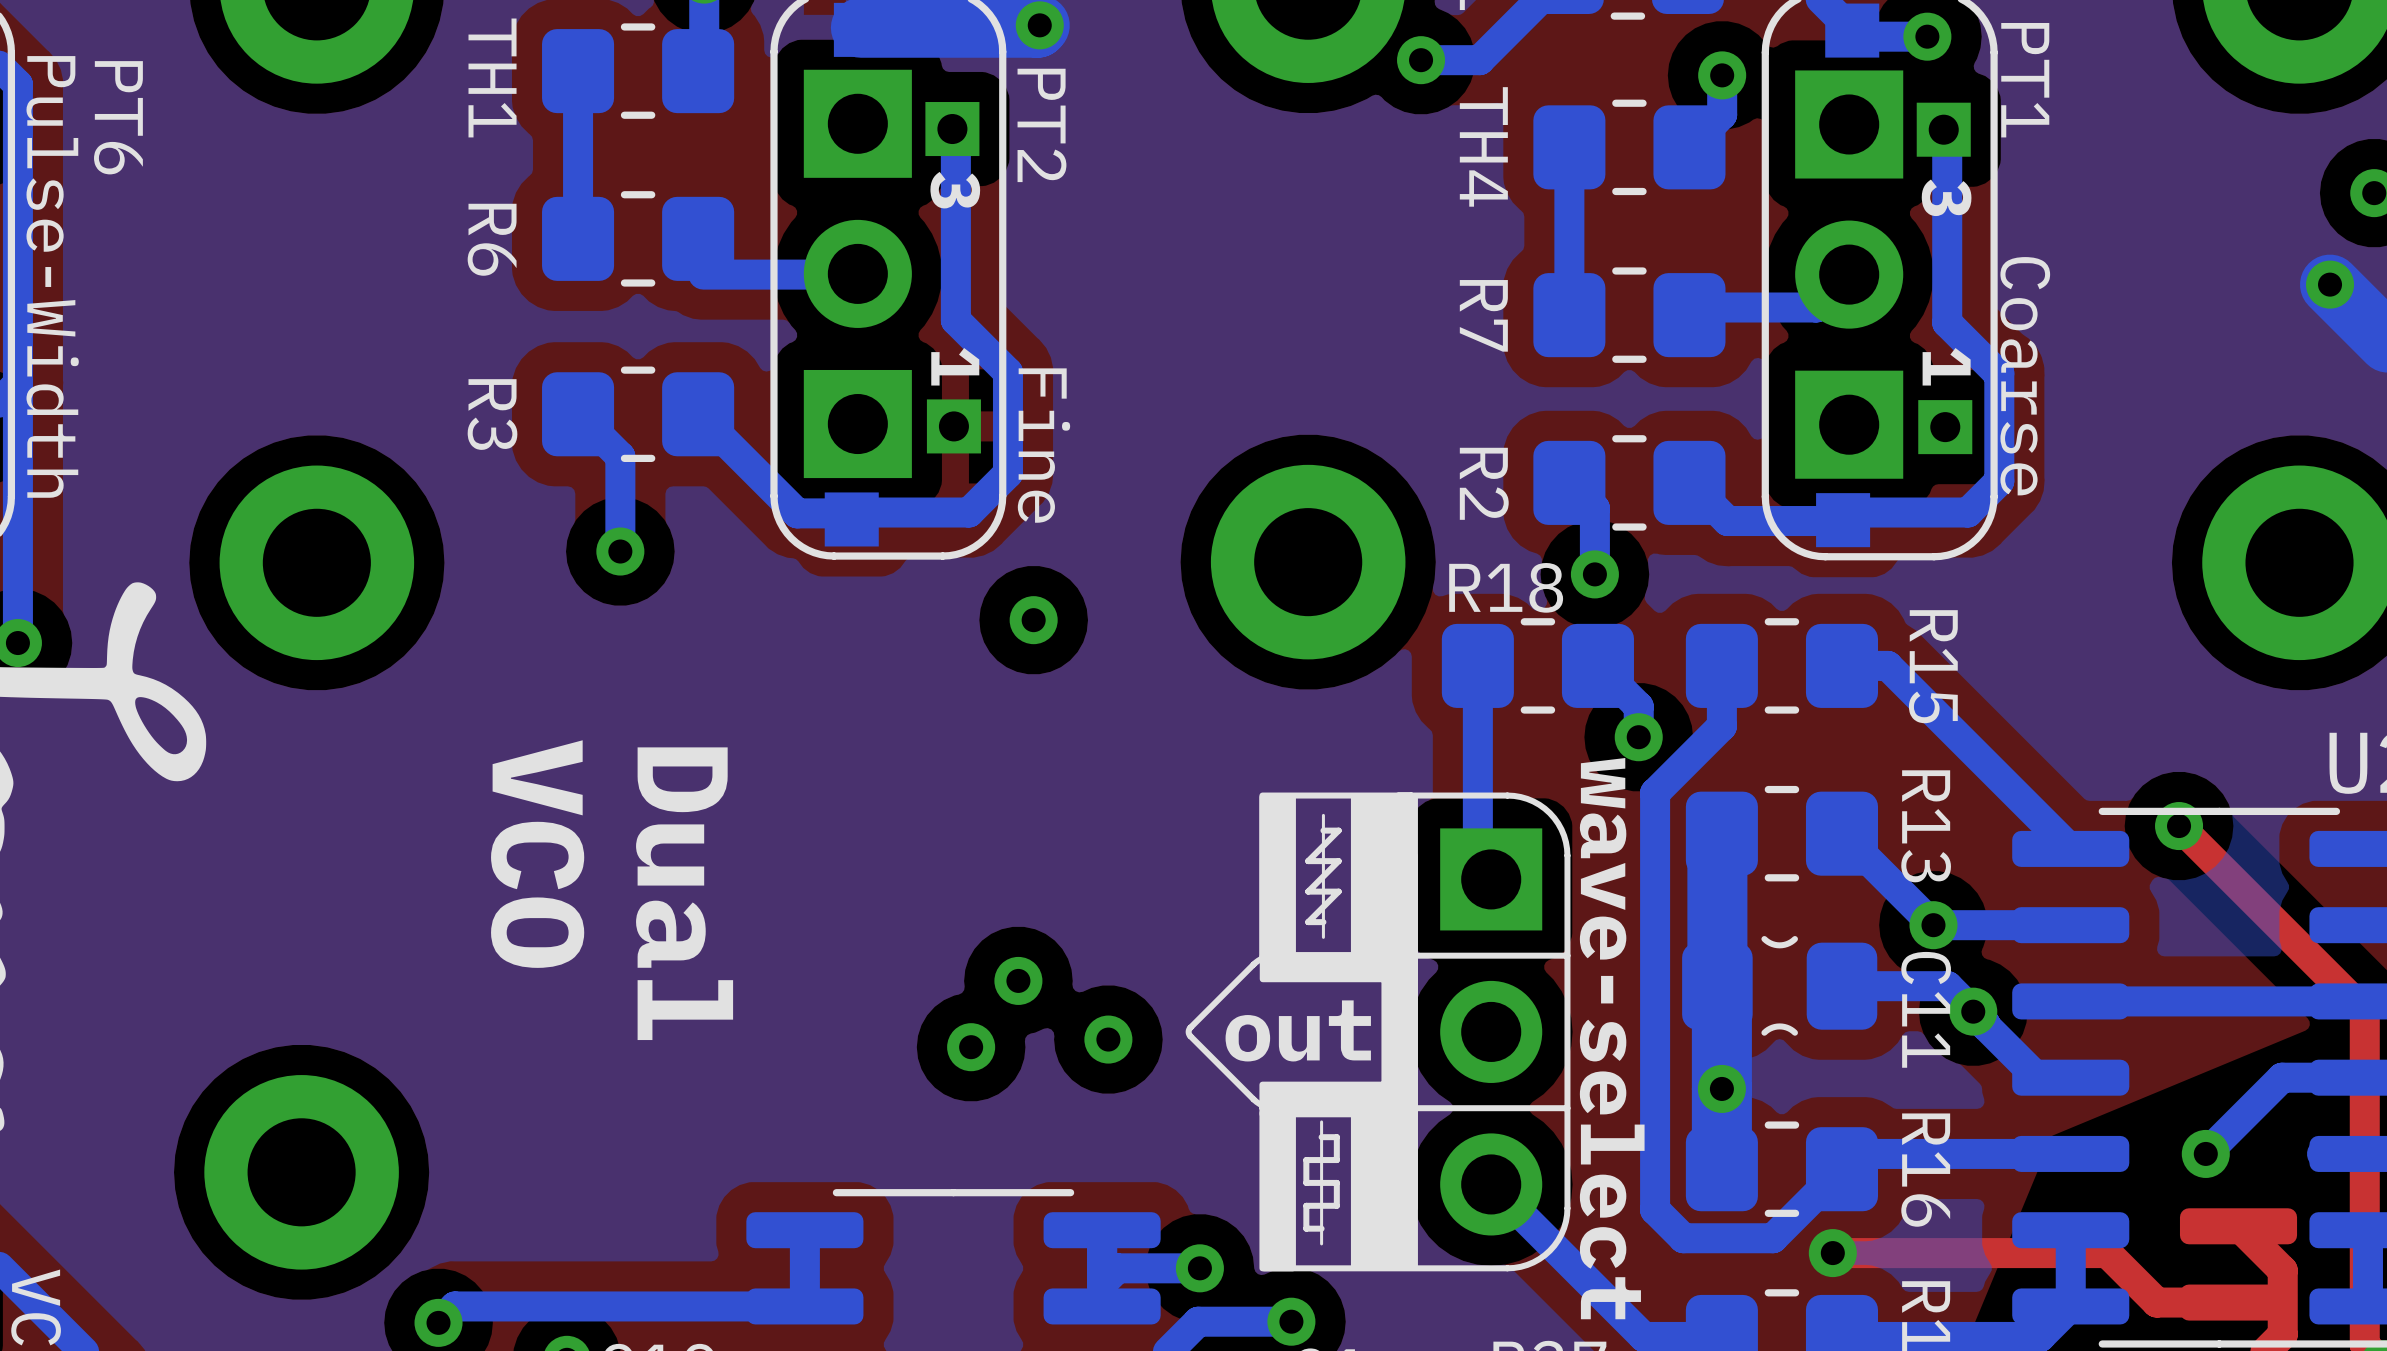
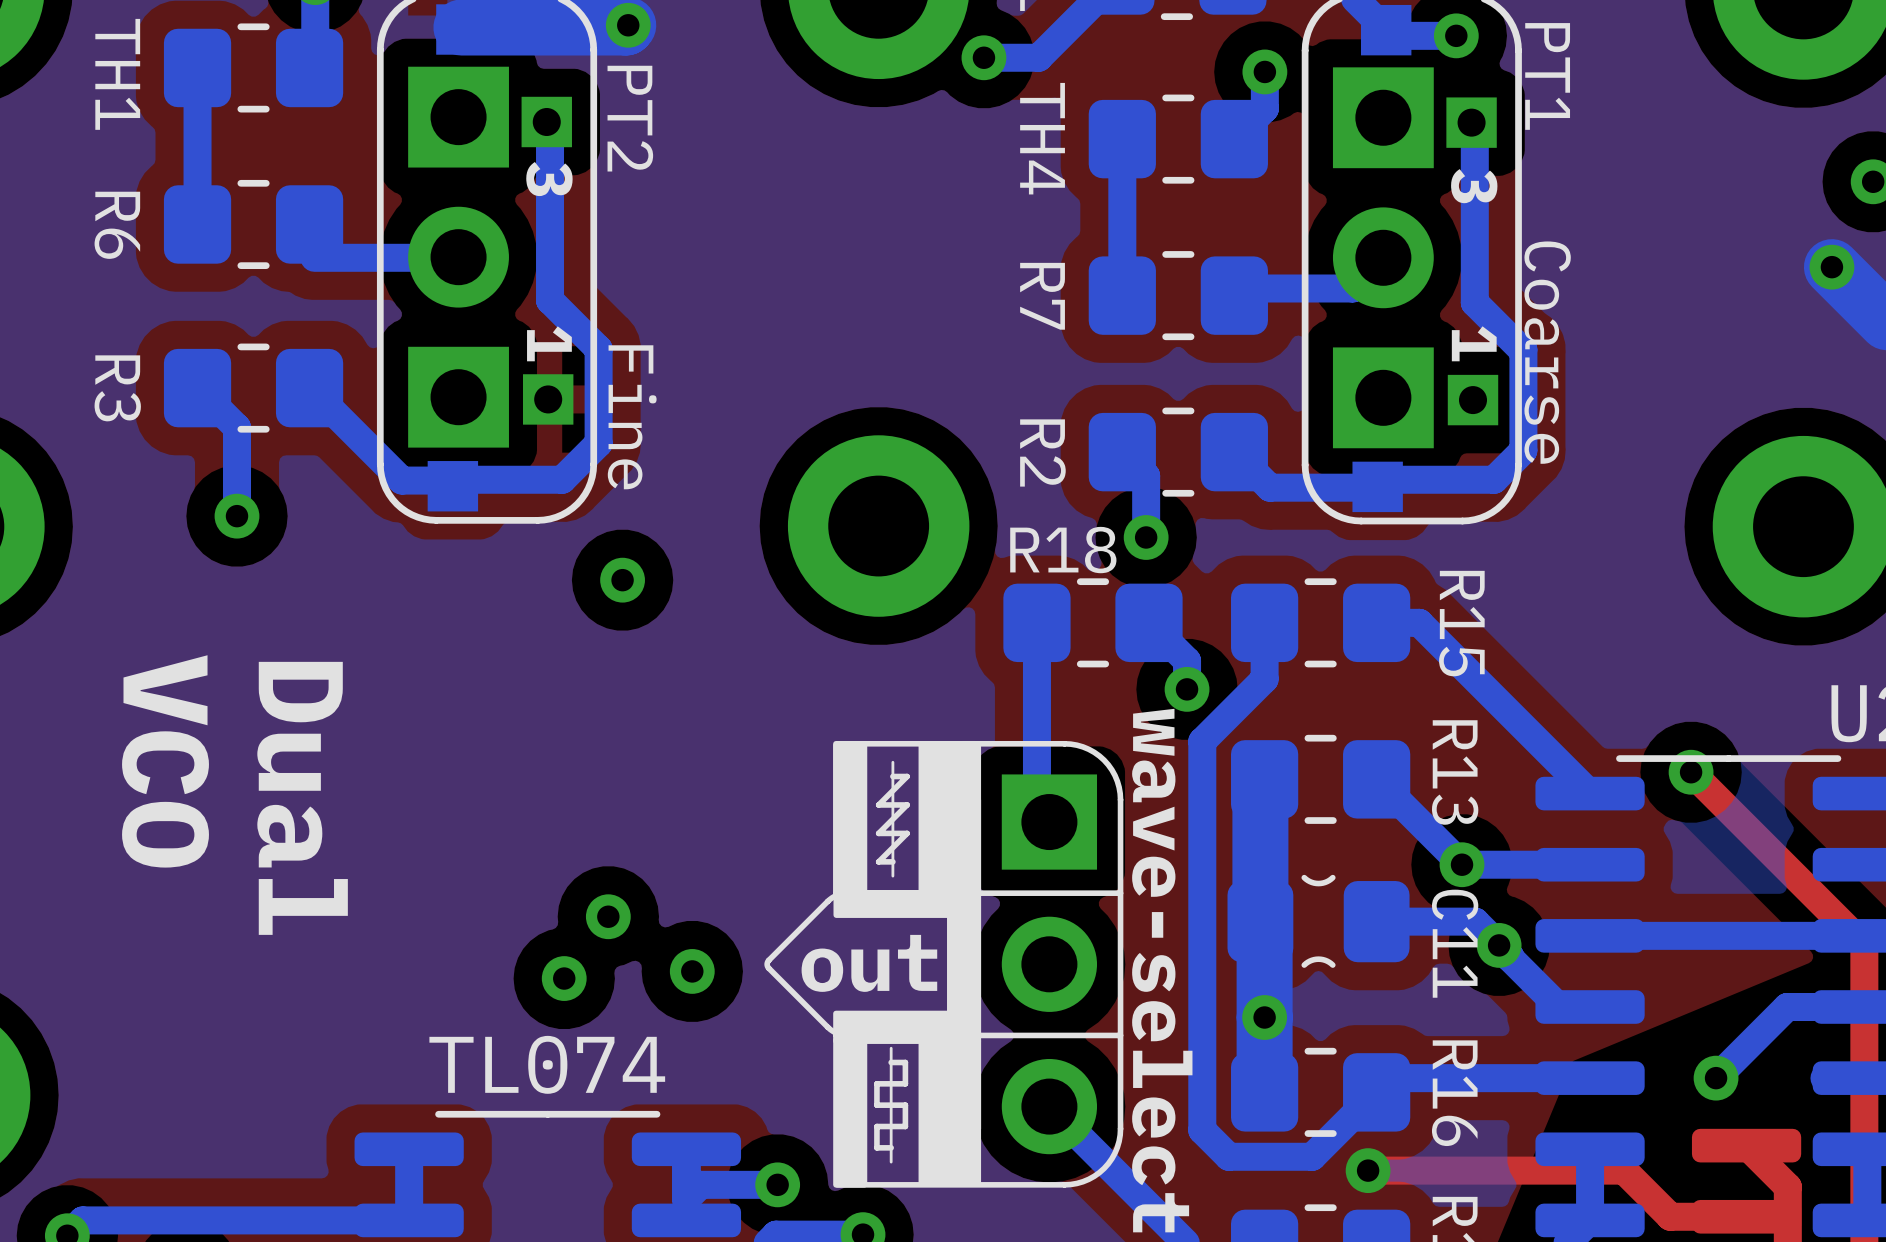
text position: VCO (537, 854) -> VCO (165, 761)
text position: Dual (684, 893) -> Dual (302, 798)
part value: none -> TL074 (547, 1064)

